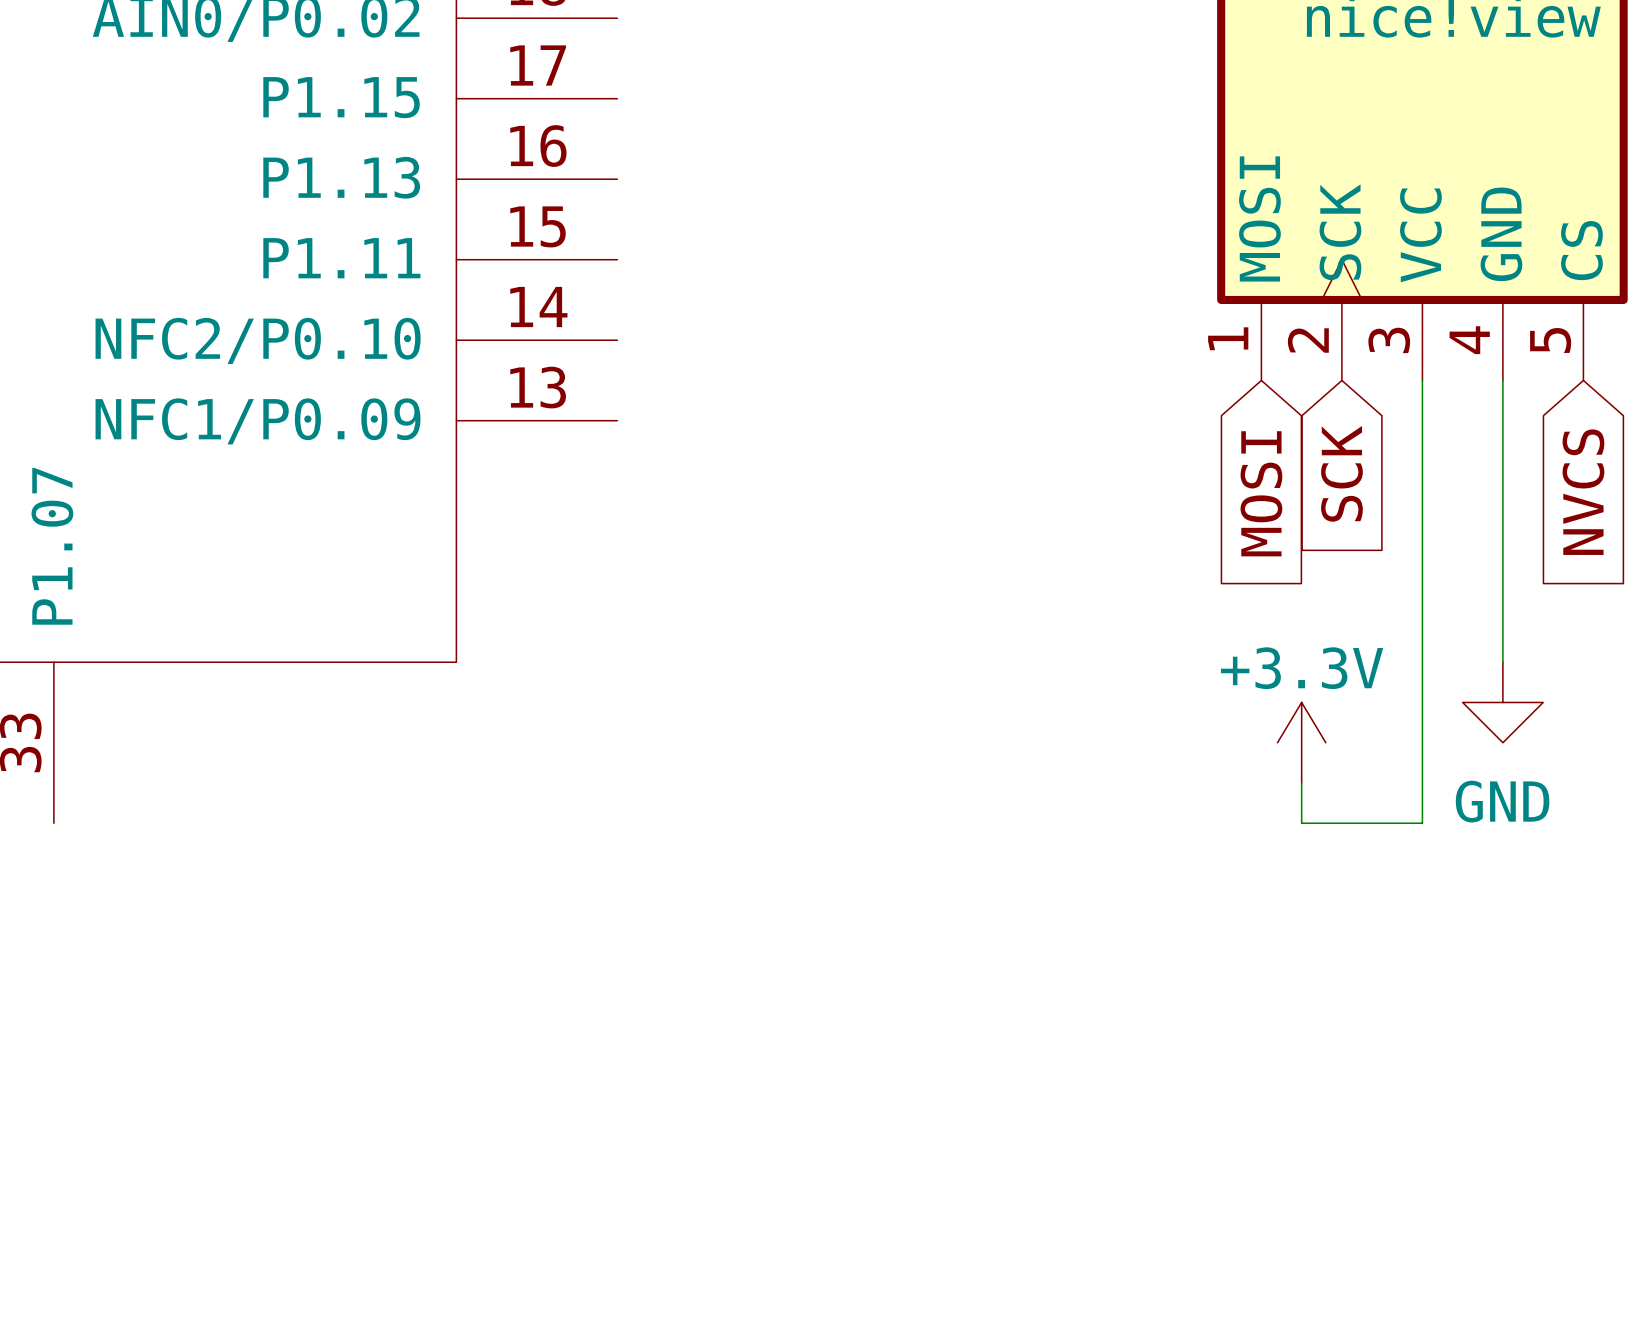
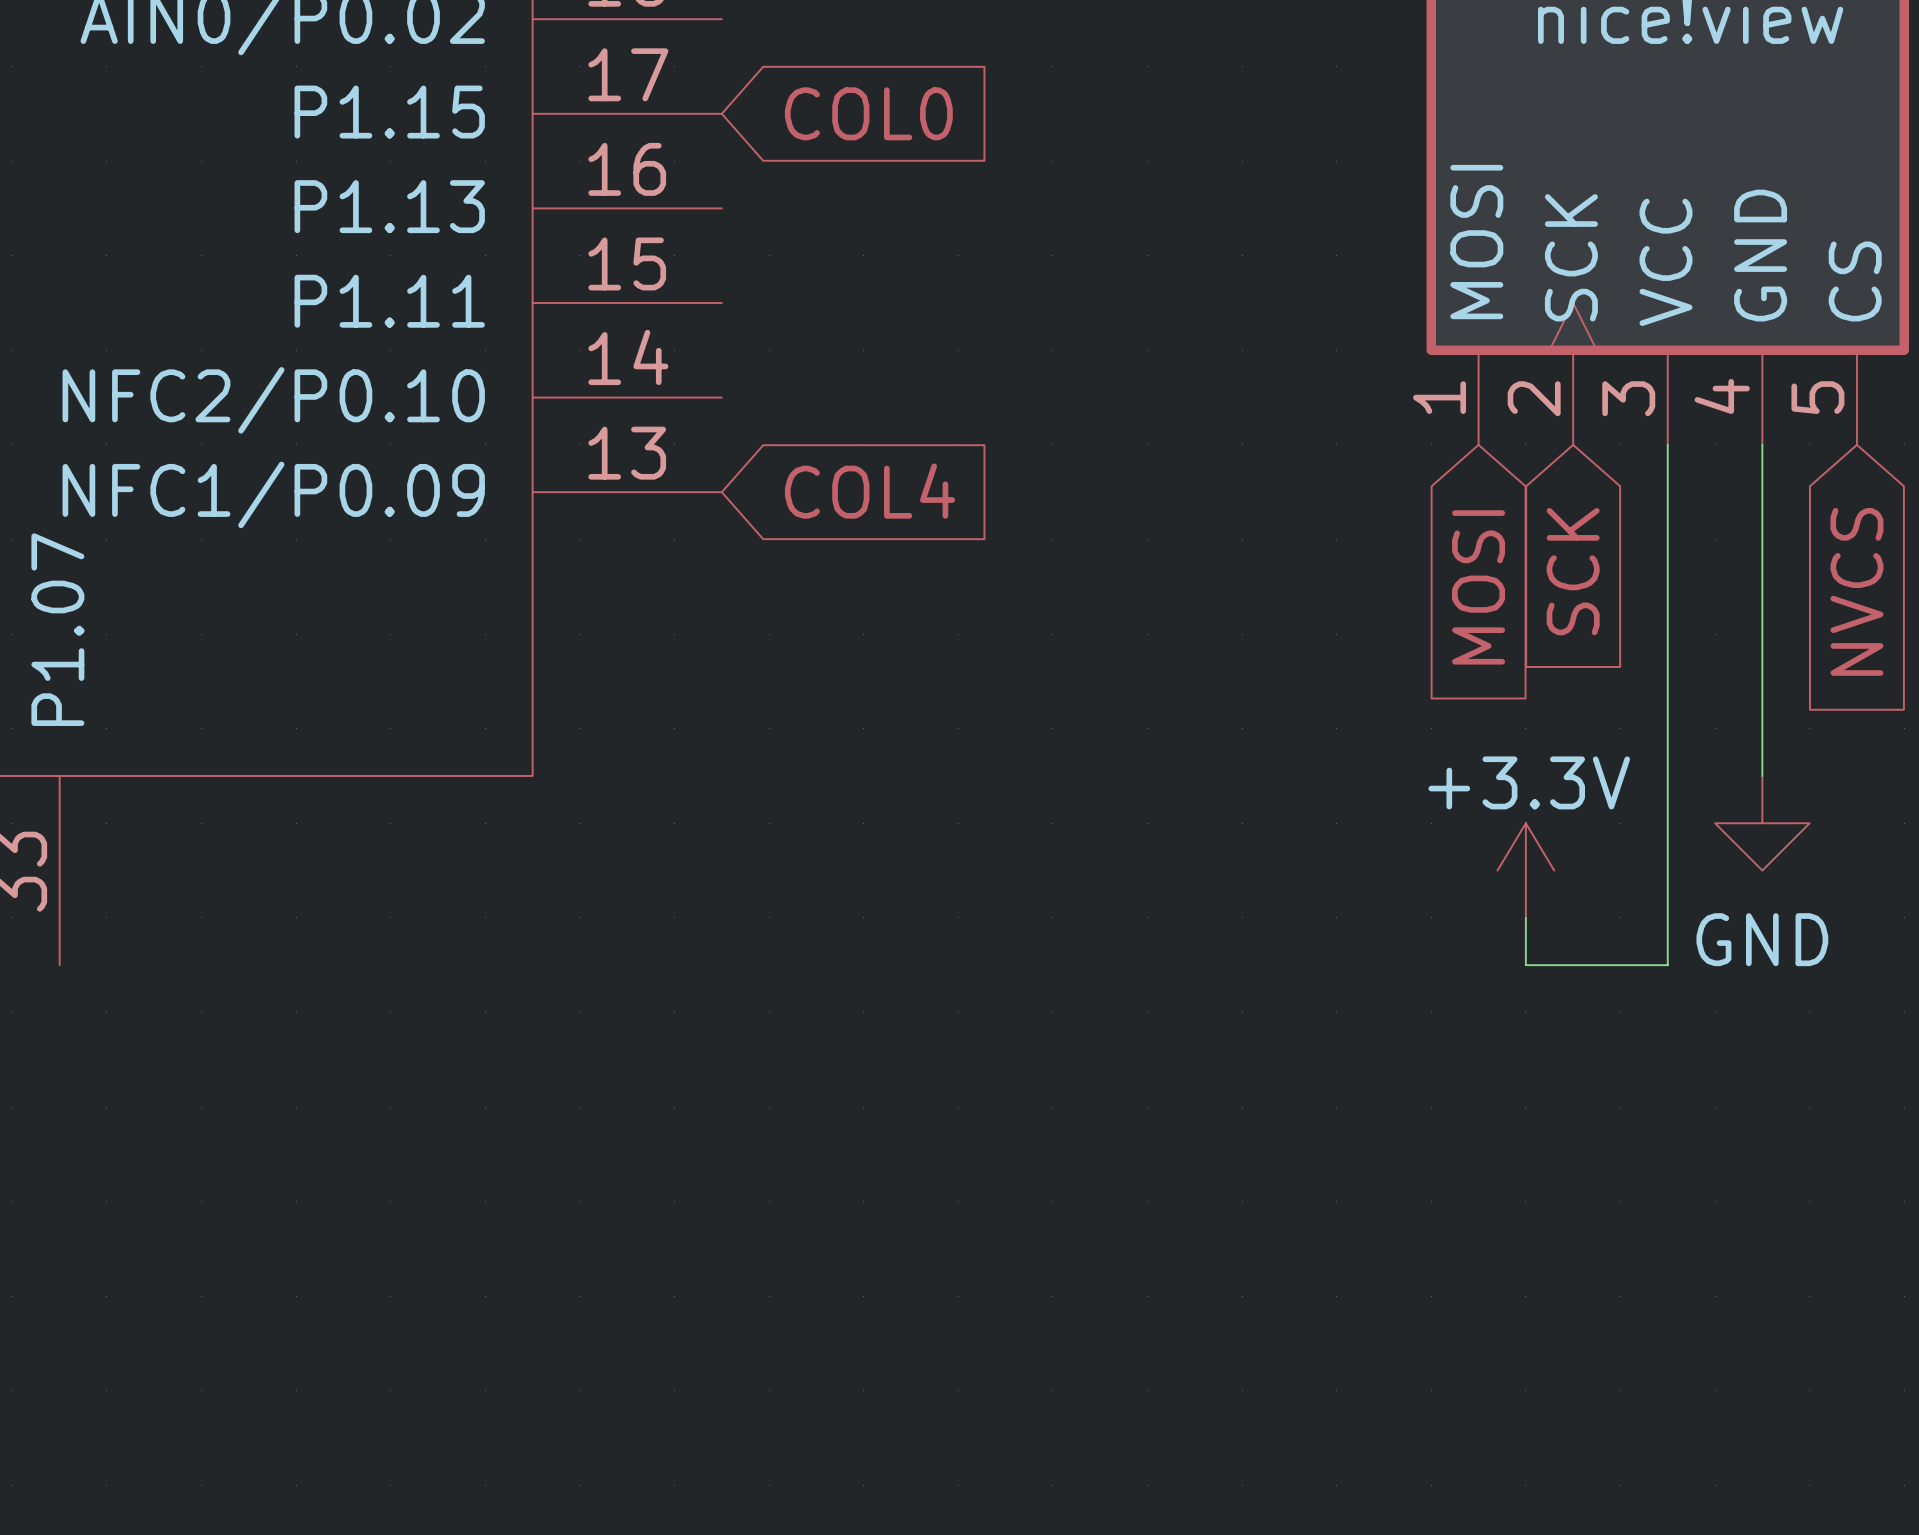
global label: none -> COL0 (868, 113)
global label: none -> COL4 (869, 491)

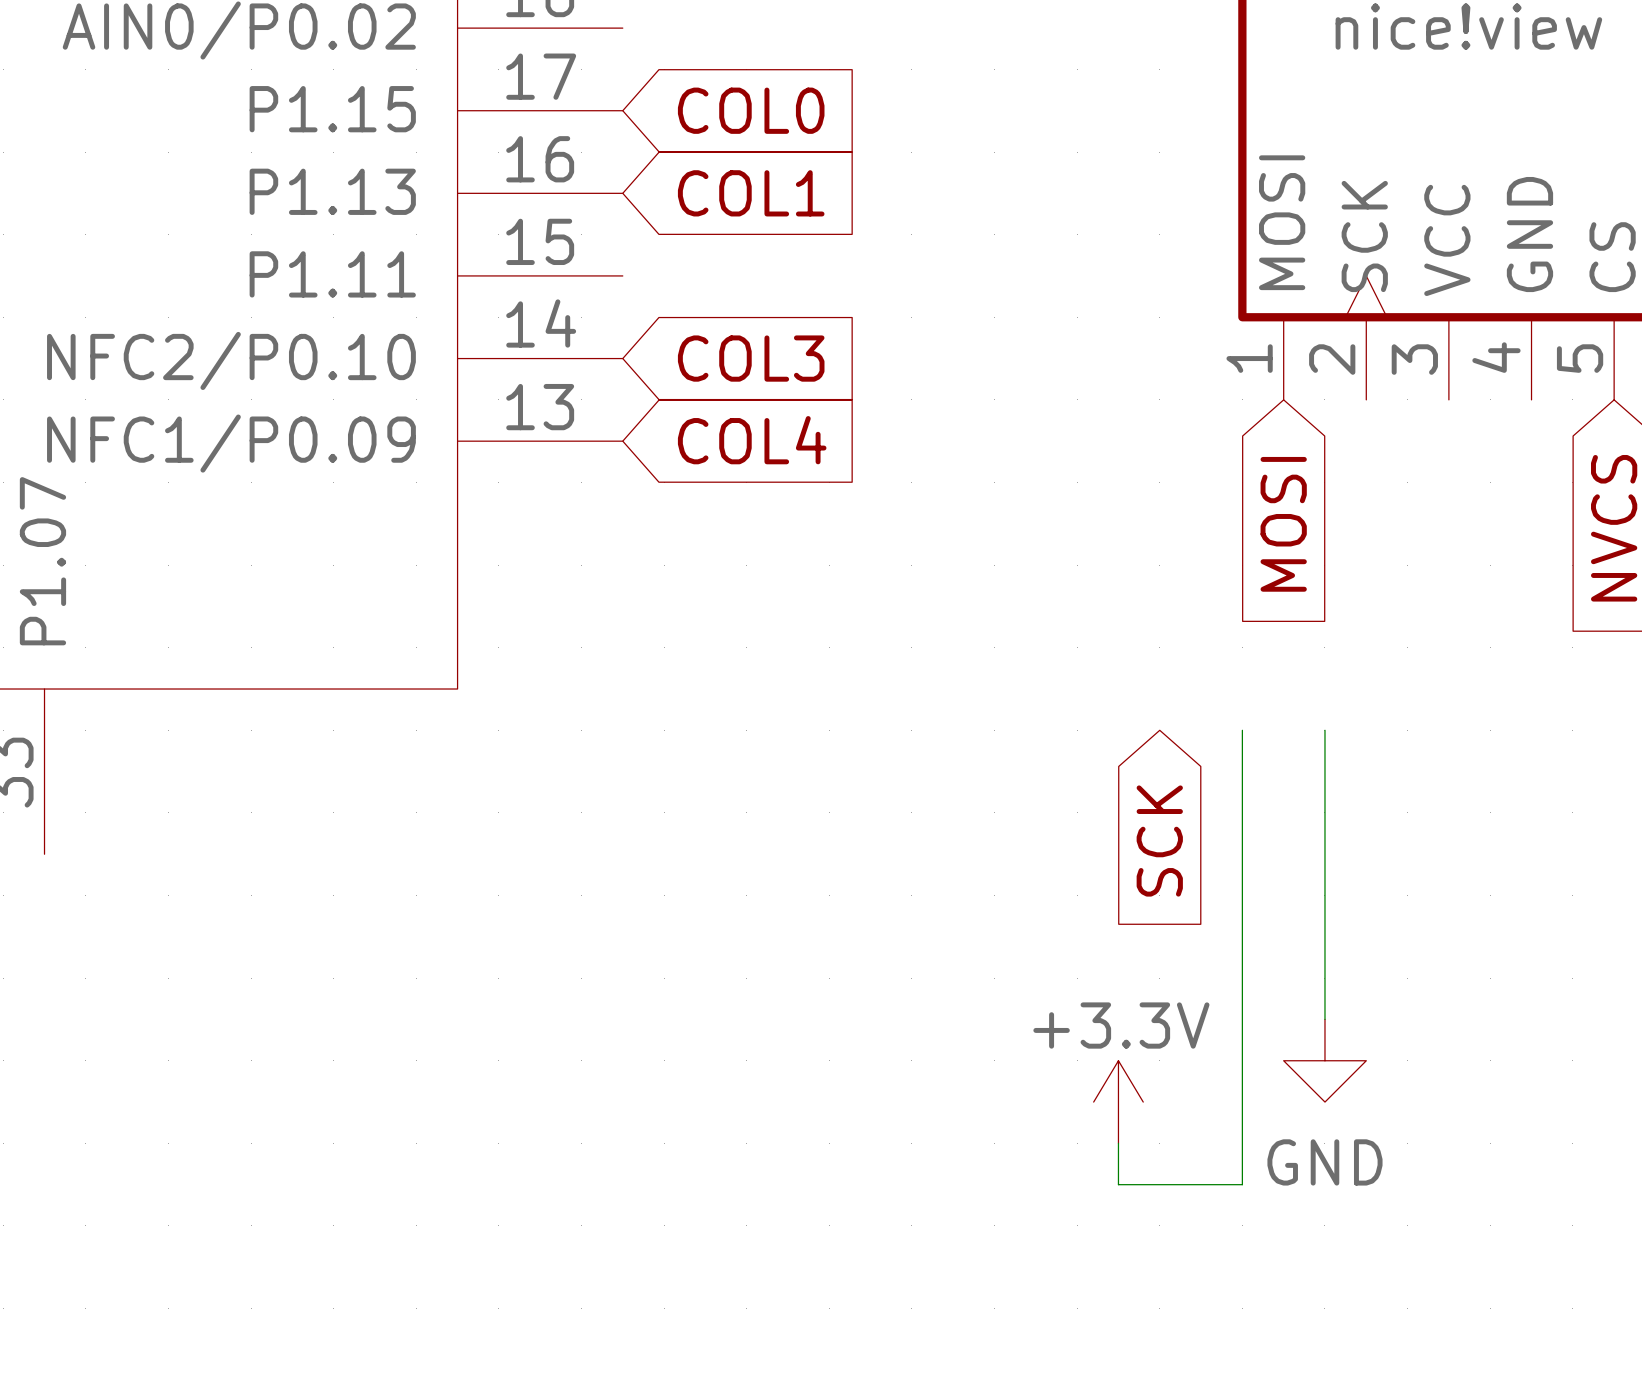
global label: none -> COL1 (751, 193)
global label: none -> COL3 (751, 358)
wire: (1667, 444) (1667, 965) (1525, 965) -> (1324, 1019) (1324, 854)
wire: (1762, 444) (1762, 775) -> none
global label position: SCK (1573, 571) -> SCK (1159, 841)
wire: none -> (1242, 730) (1242, 1184) (1118, 1184) (1118, 1143)
power symbol position: GND (1762, 823) -> GND (1324, 1060)
power symbol position: +3.3V (1525, 870) -> +3.3V (1118, 1102)

